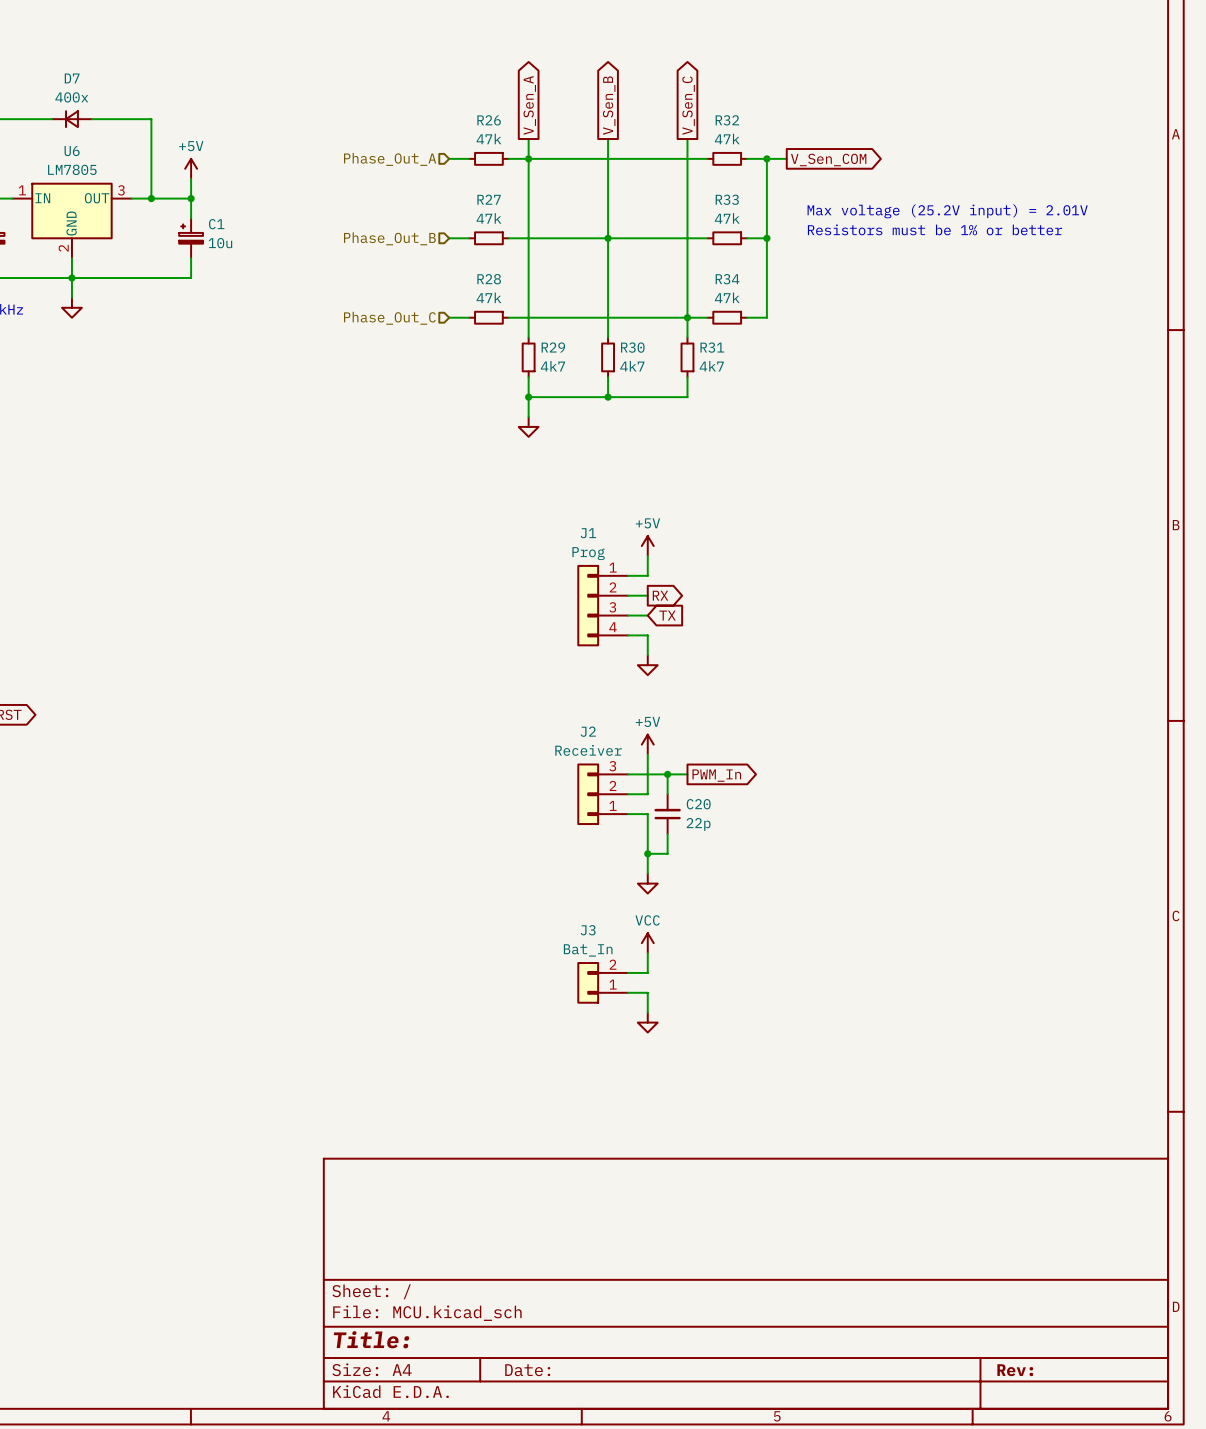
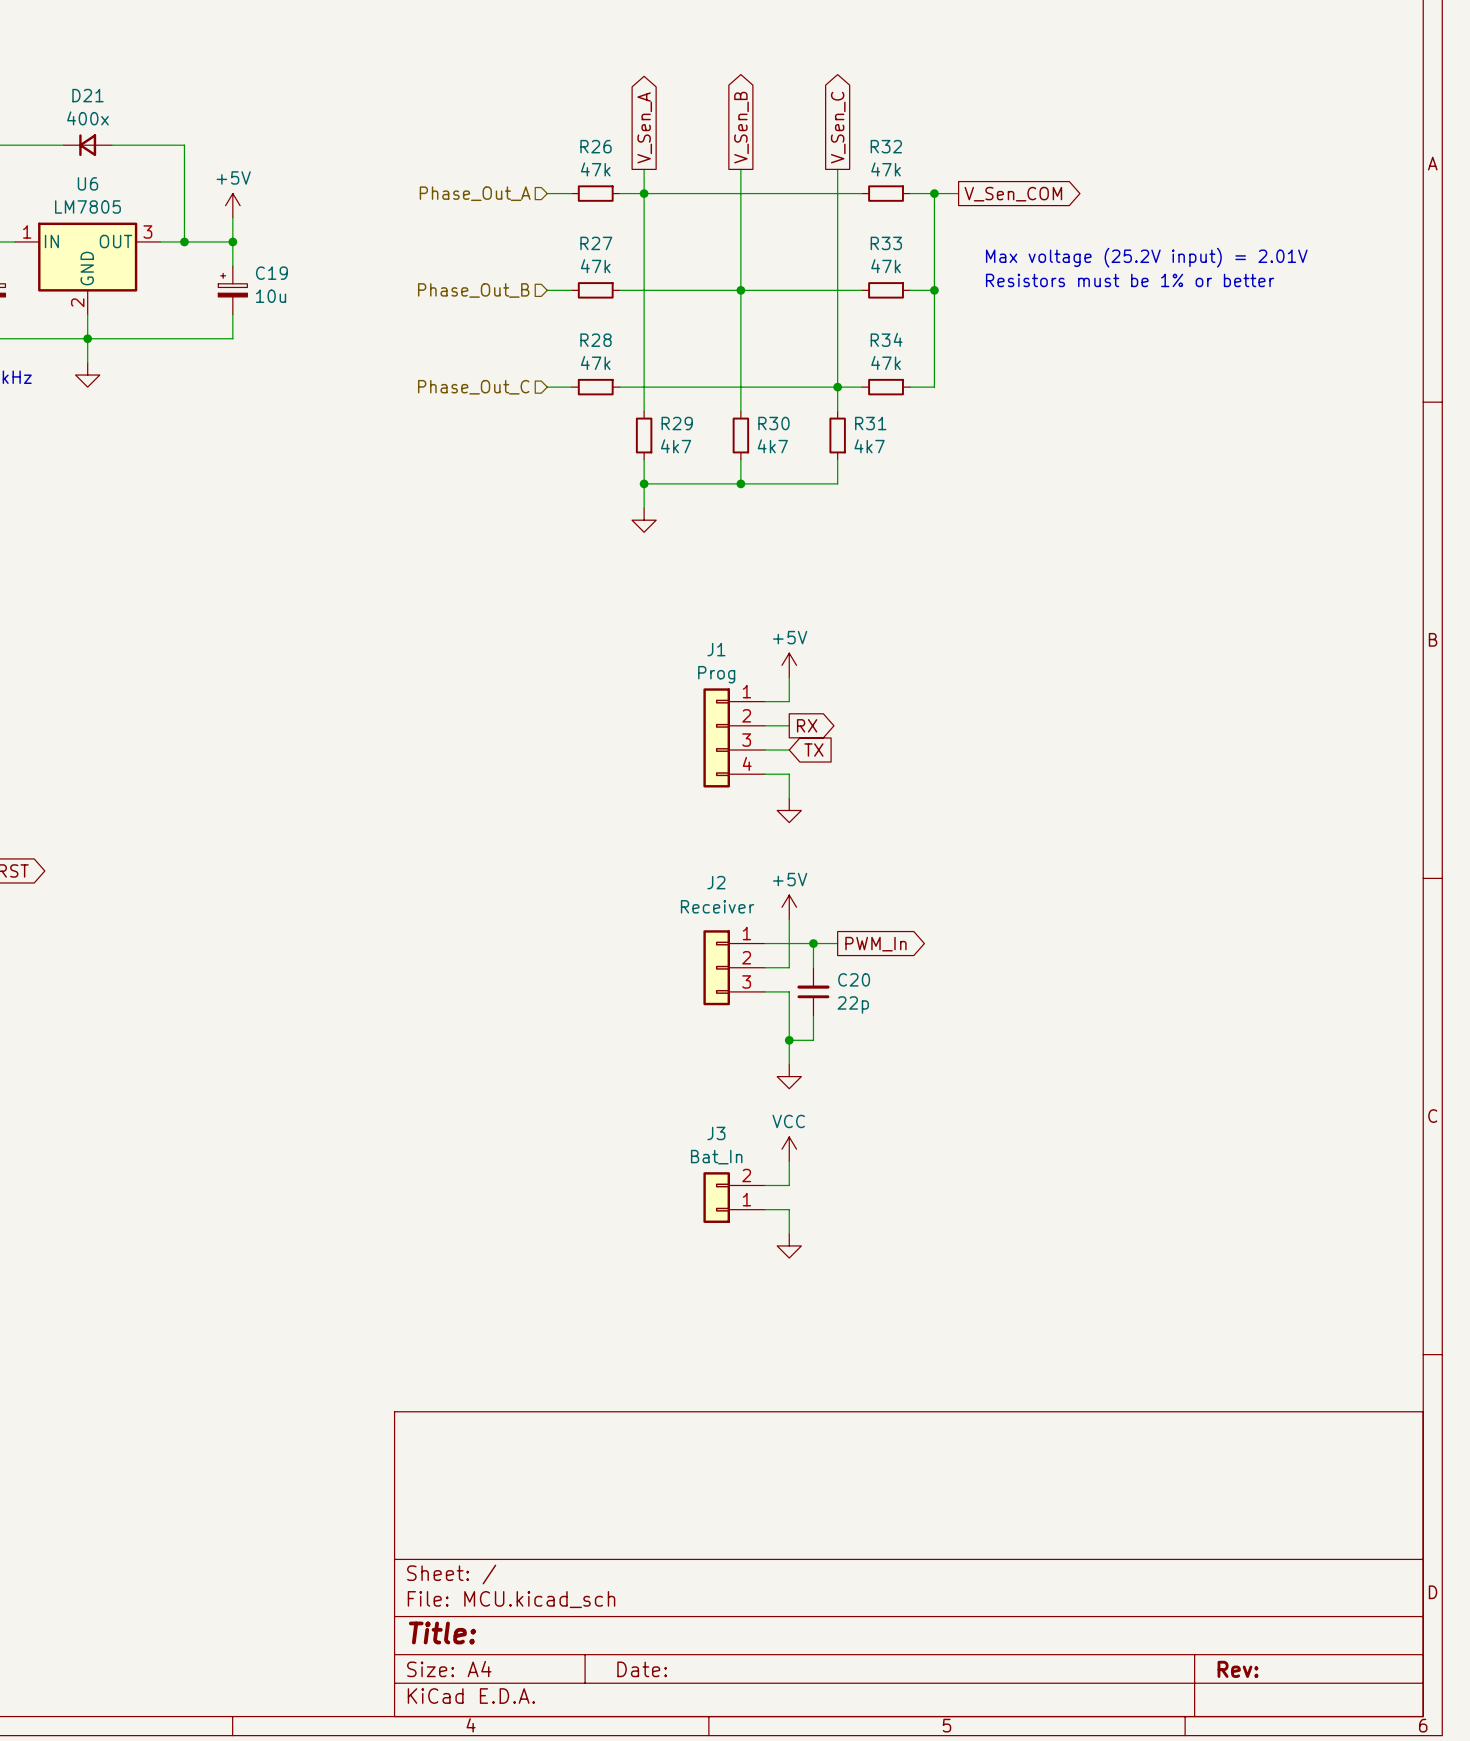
D7 name: D7 (72, 78) -> D21 (87, 95)
C1 name: C1 (216, 224) -> C19 (271, 273)
J2 flip: as is (588, 794) -> up-down (716, 967)

